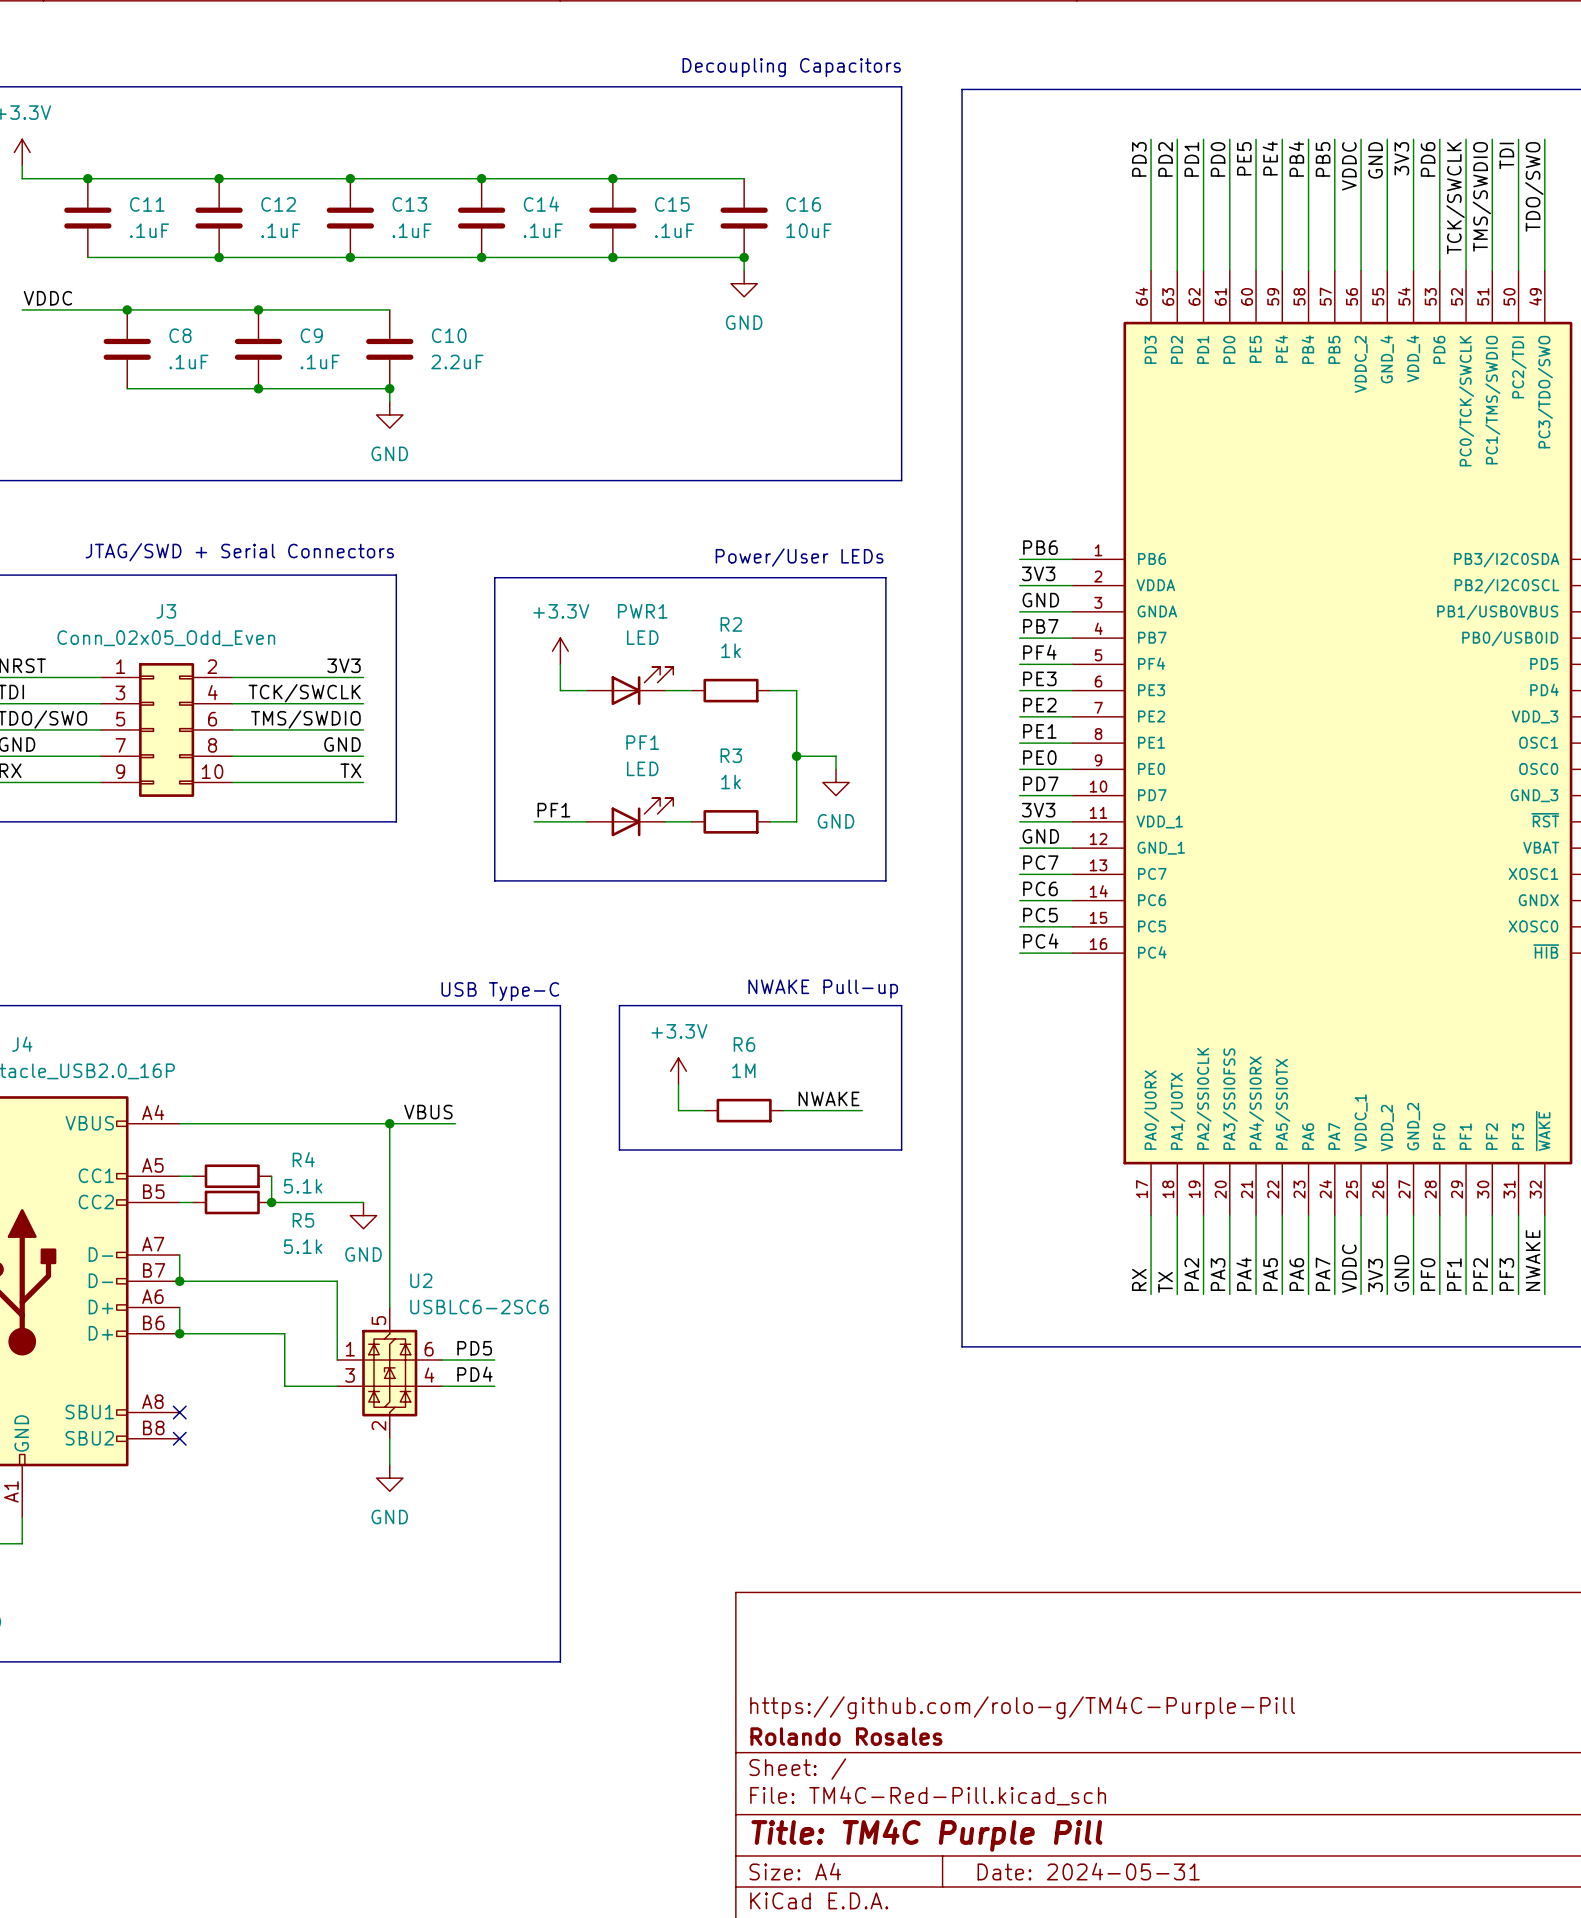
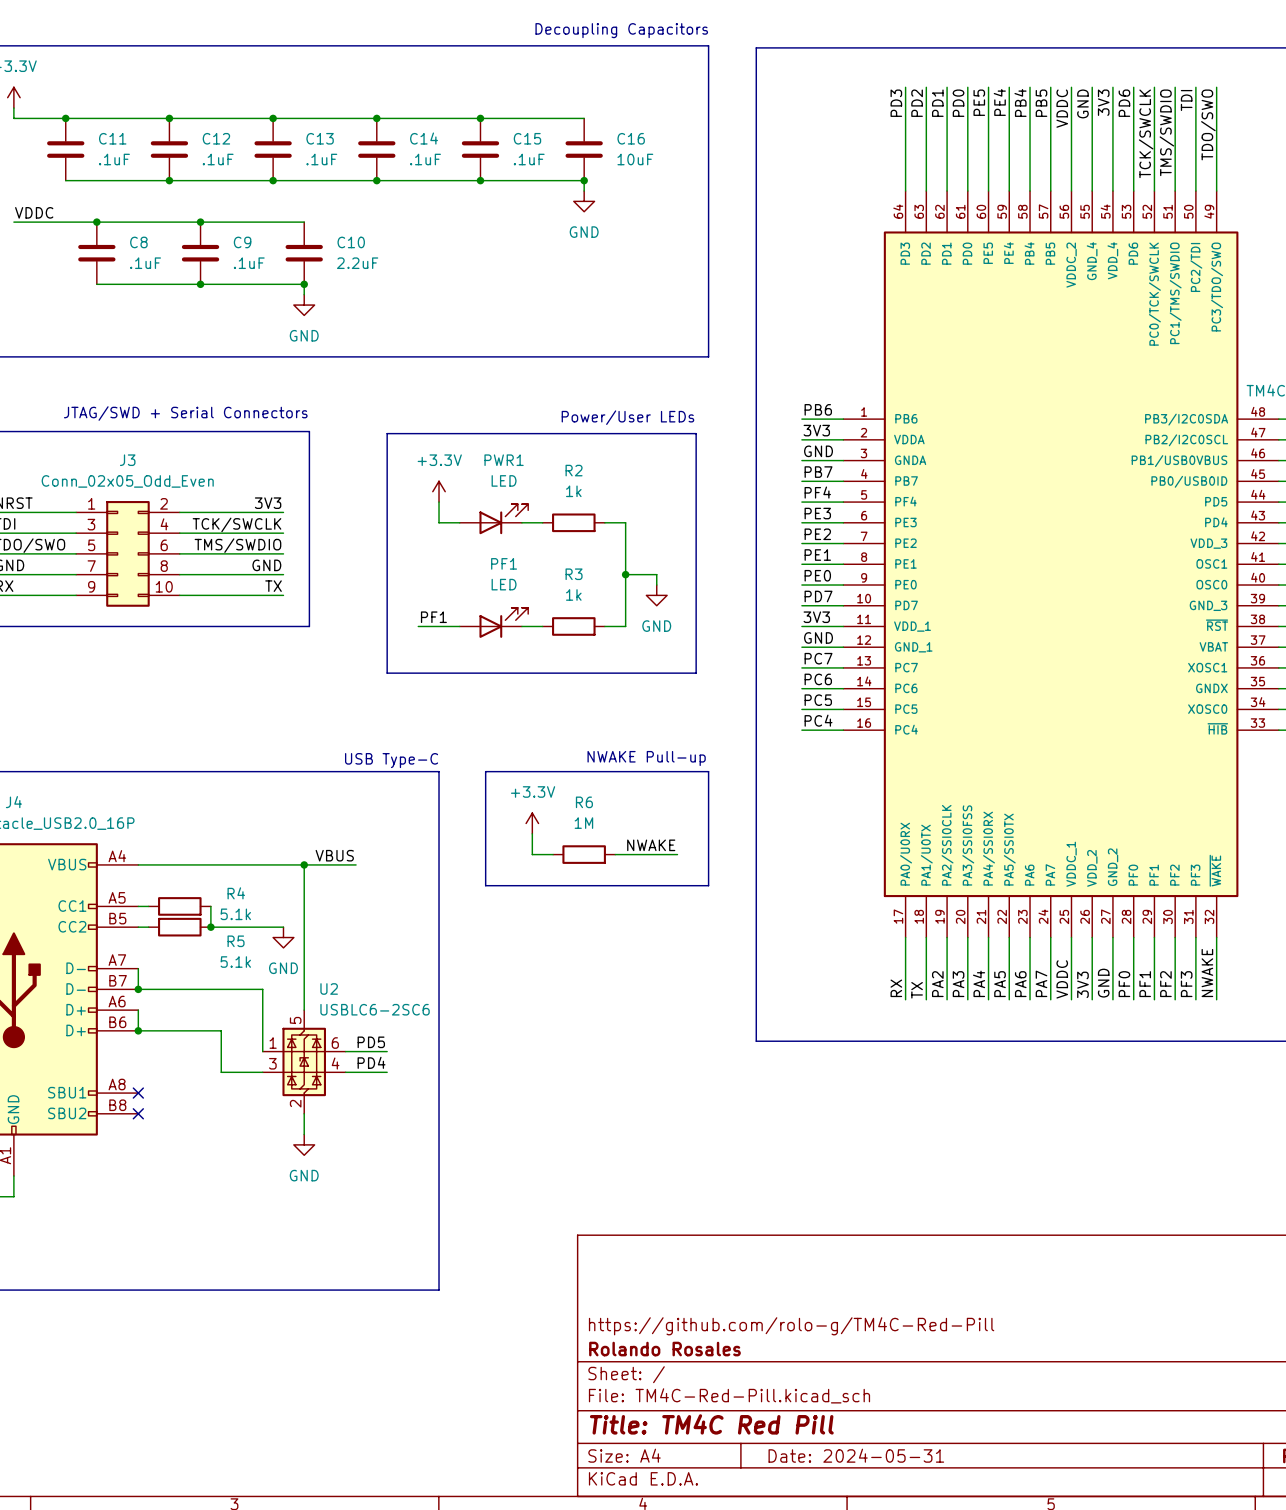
title block: https://github.com/rolo-g/TM4C-Purple-Pill (1022, 1707) -> https://github.com/rolo-g/TM4C-Red-Pill (791, 1326)
title block: Title: TM4C Purple Pill (926, 1835) -> Title: TM4C Red Pill (711, 1424)

